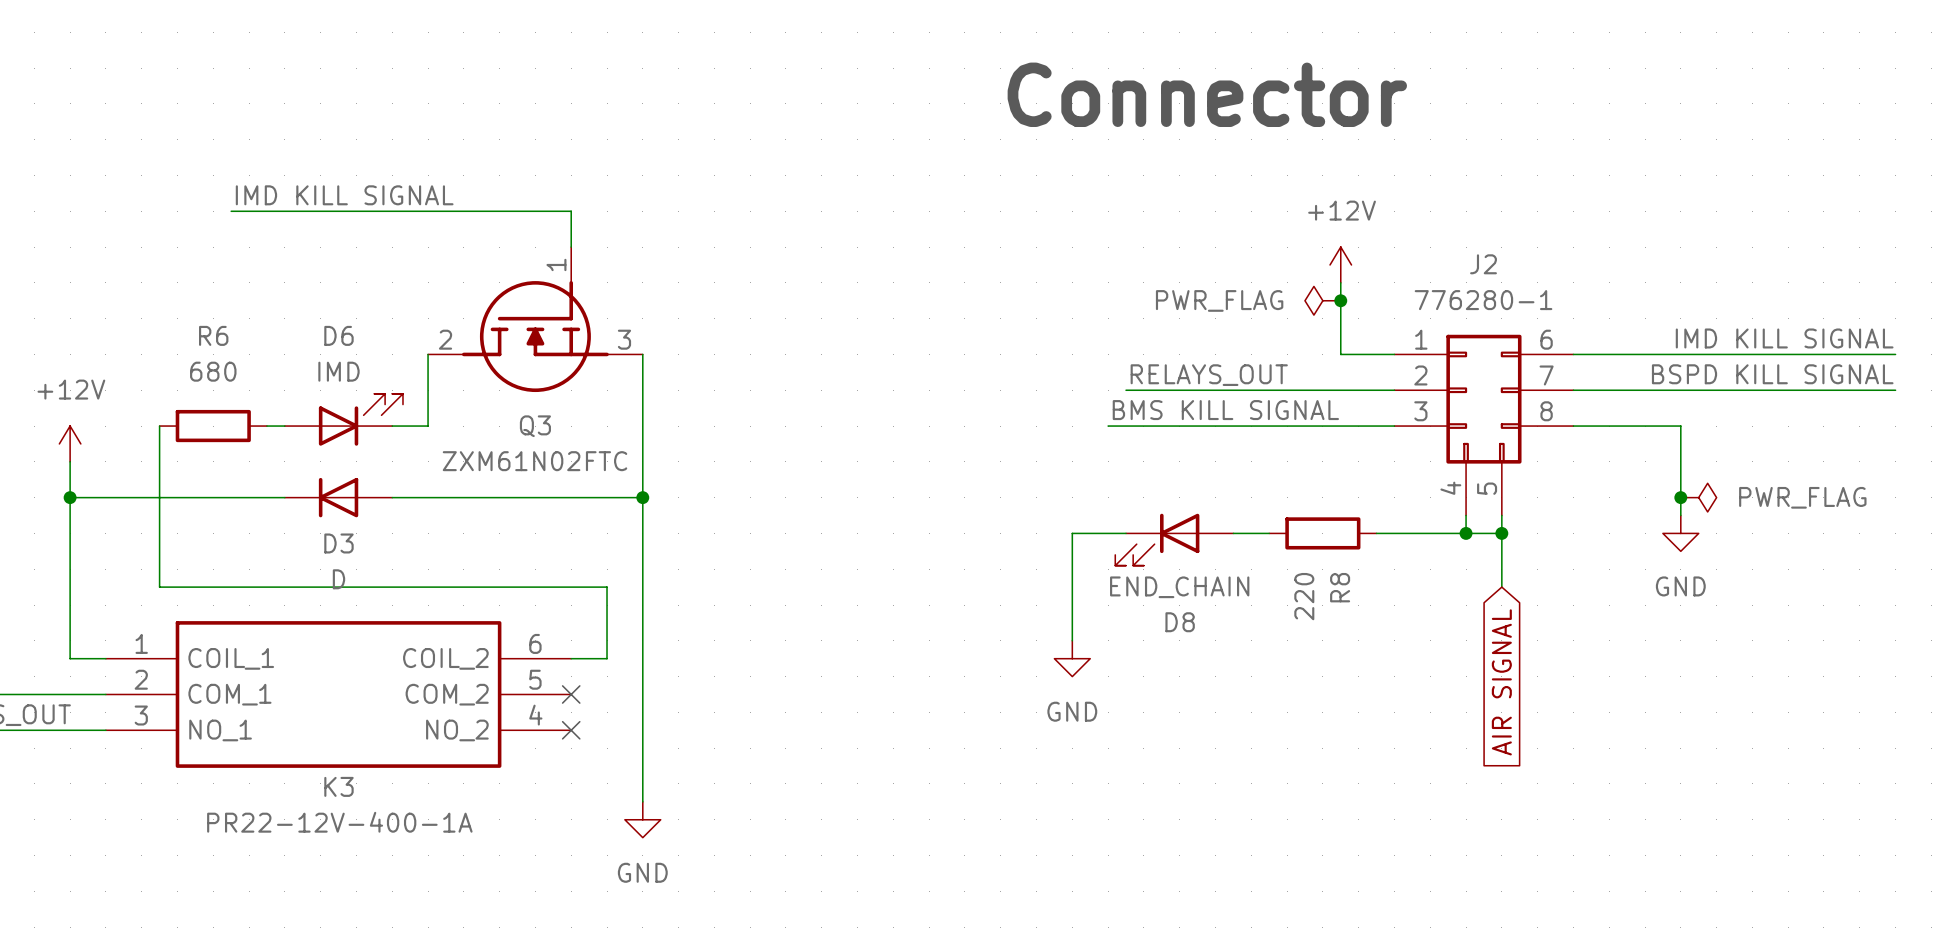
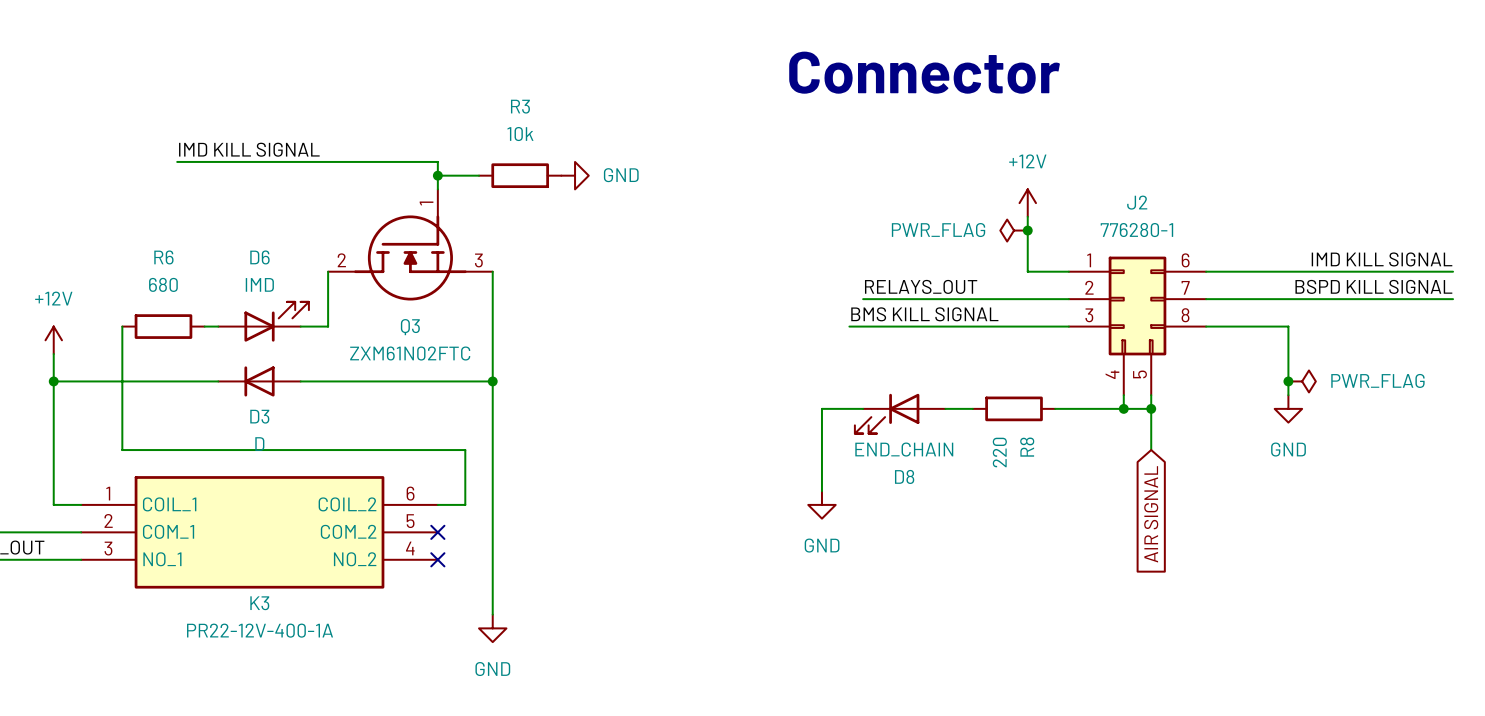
wire: none -> (437, 175) (479, 175)
junction: none -> (437, 175)
R3: none -> 10k (520, 175)
power symbol: none -> GND (575, 175)

